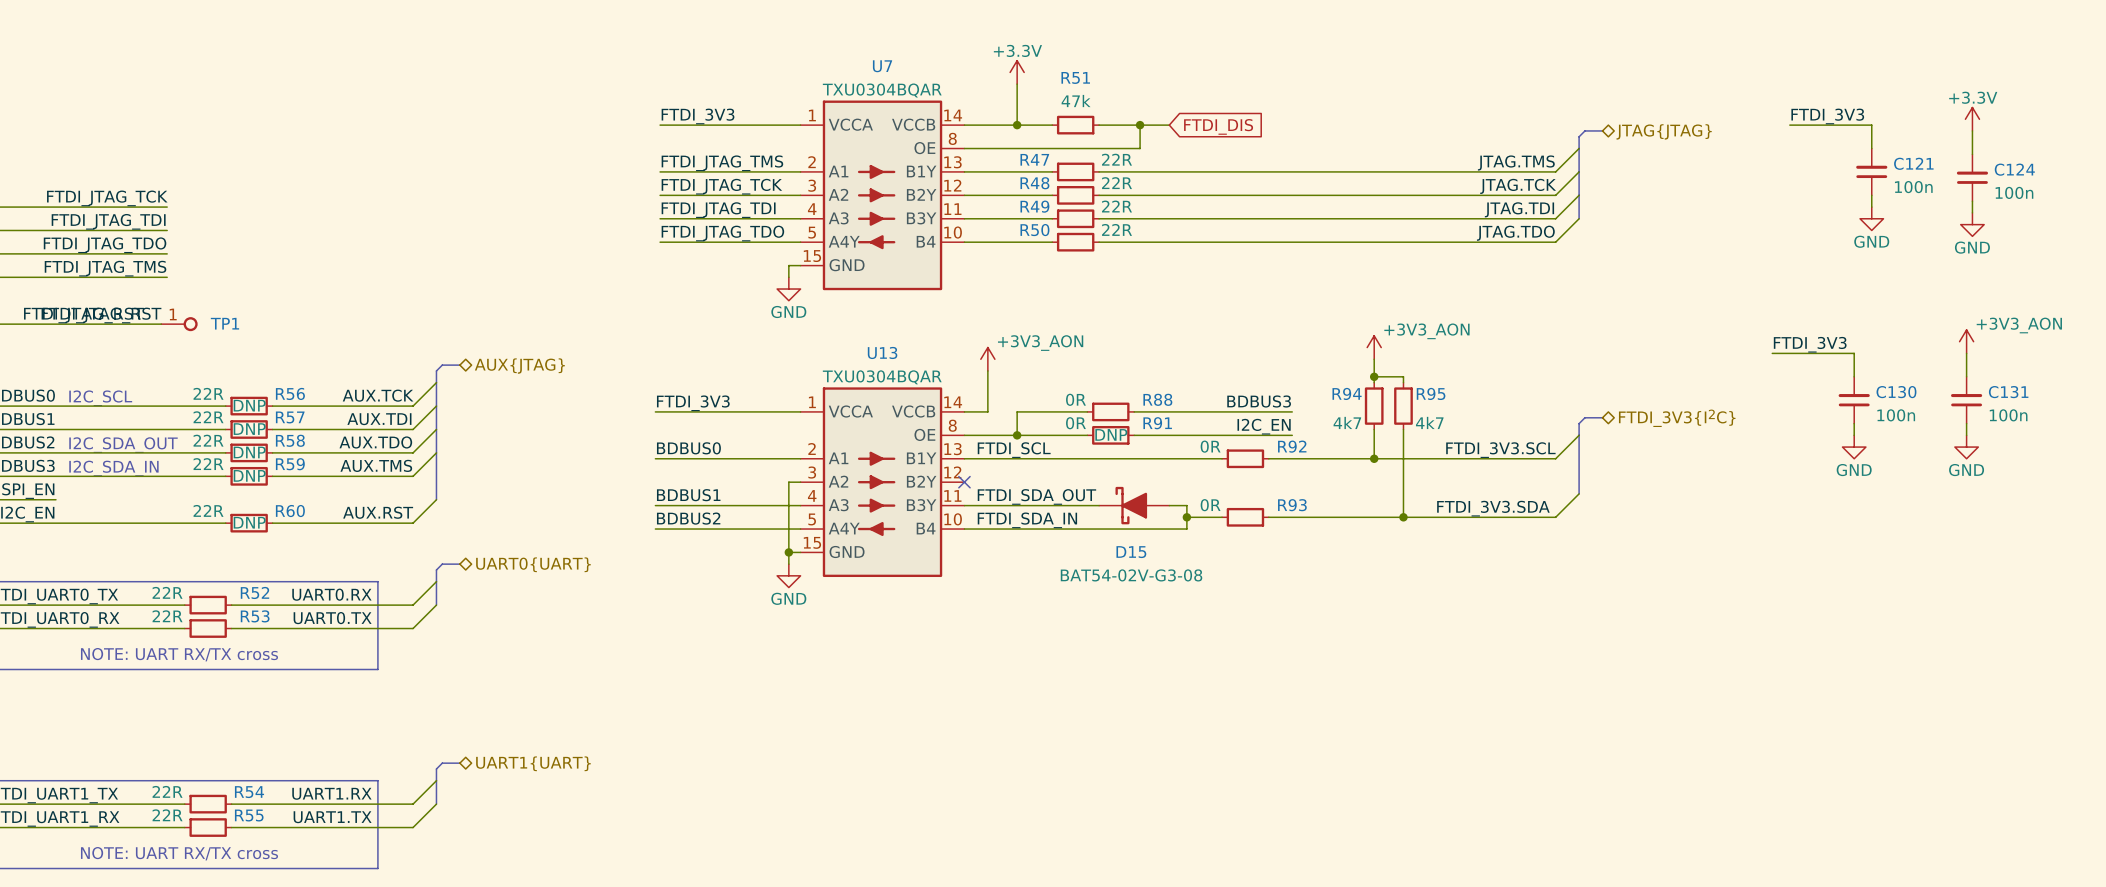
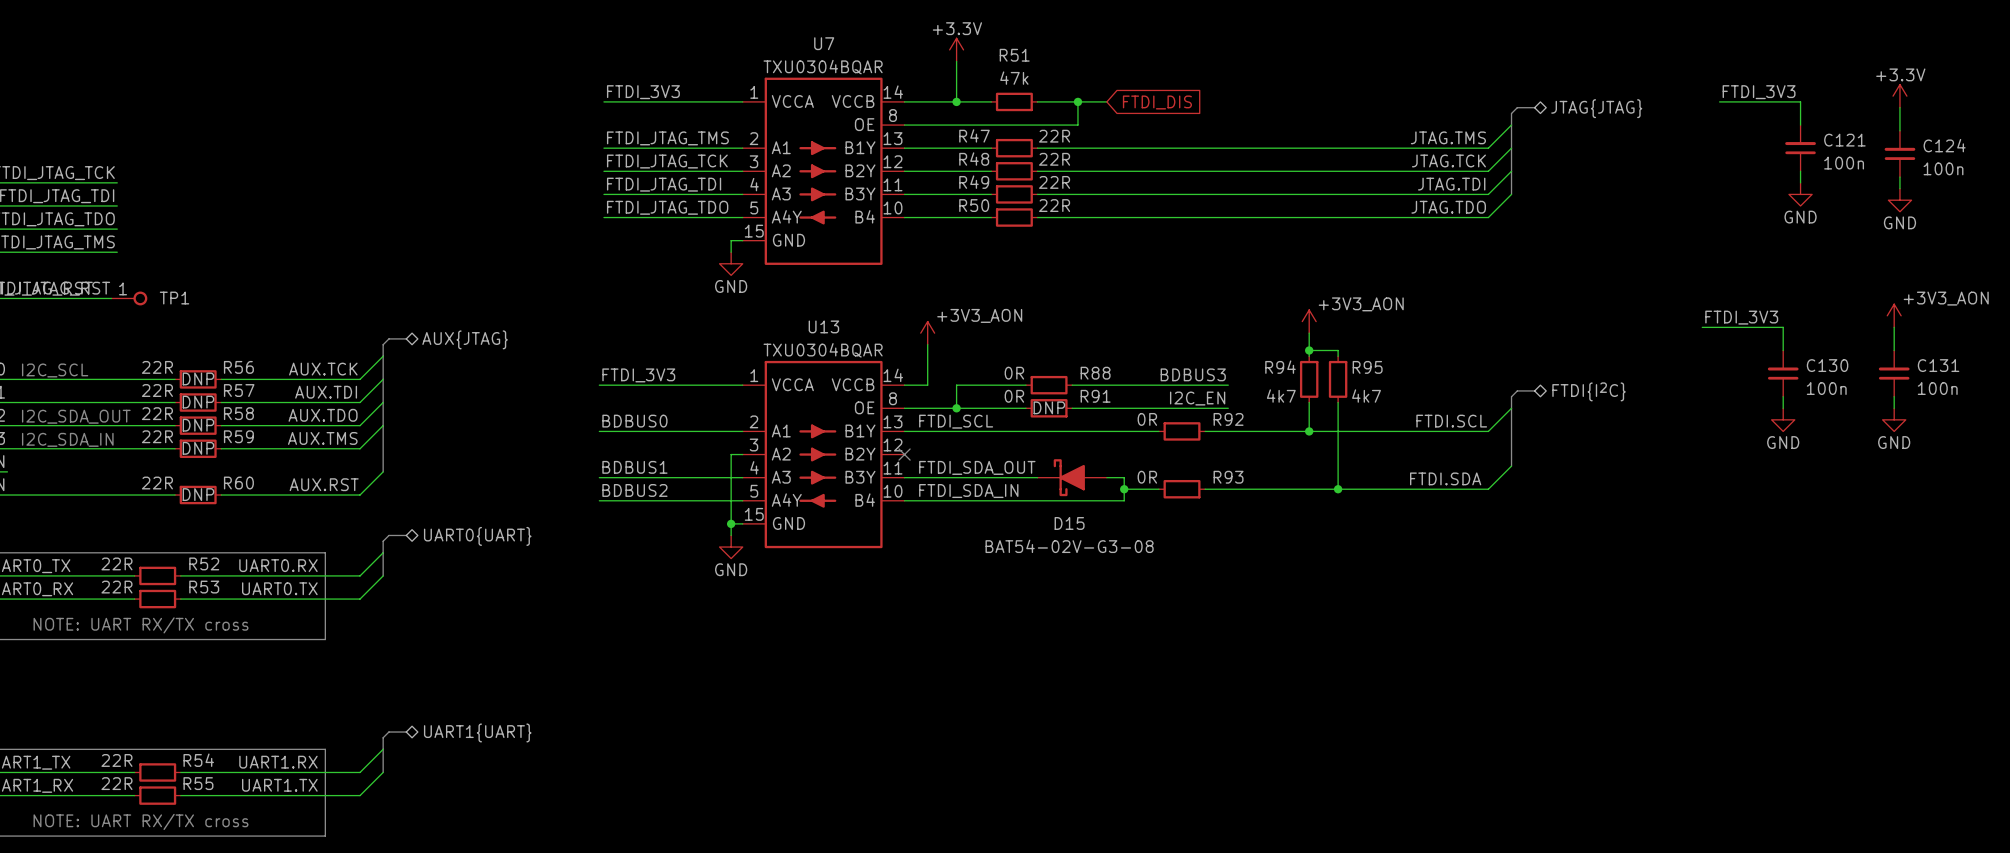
hierarchical label: FTDI_3V3{I2C} (1677, 418) -> FTDI{I2C} (1589, 391)
label: FTDI_3V3.SCL (1500, 450) -> FTDI.SCL (1451, 421)
label: FTDI_3V3.SDA (1493, 508) -> FTDI.SDA (1445, 478)

